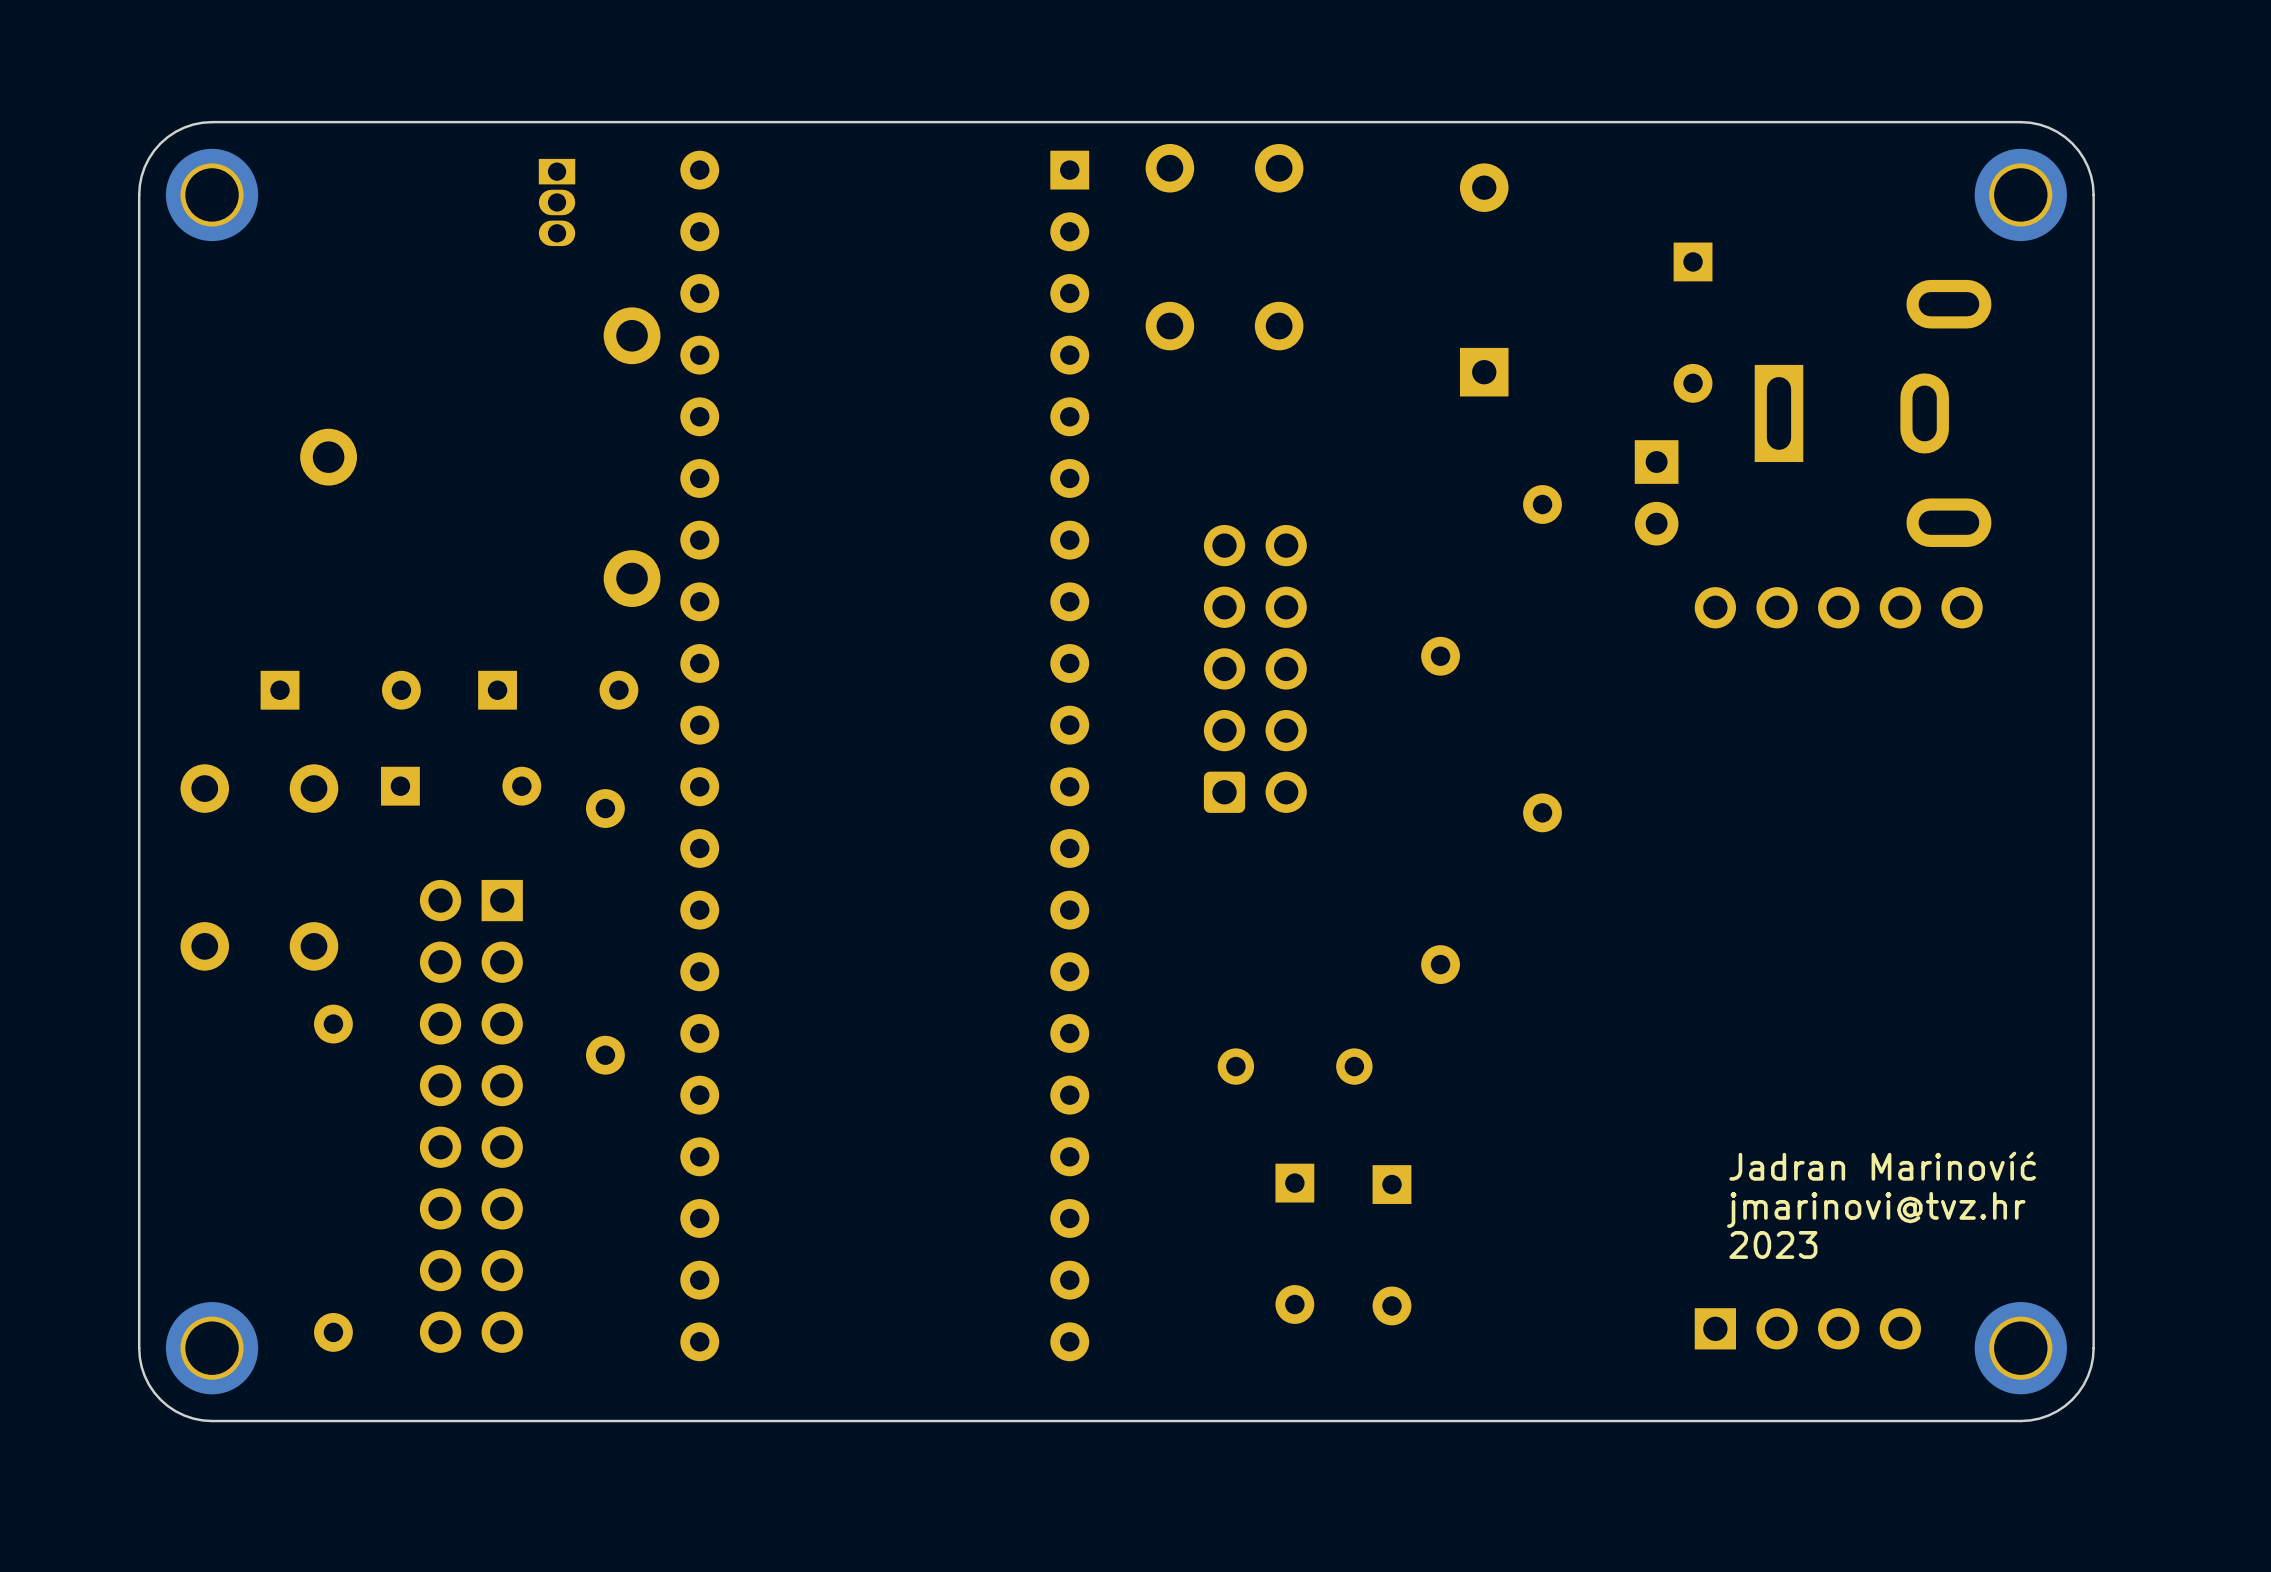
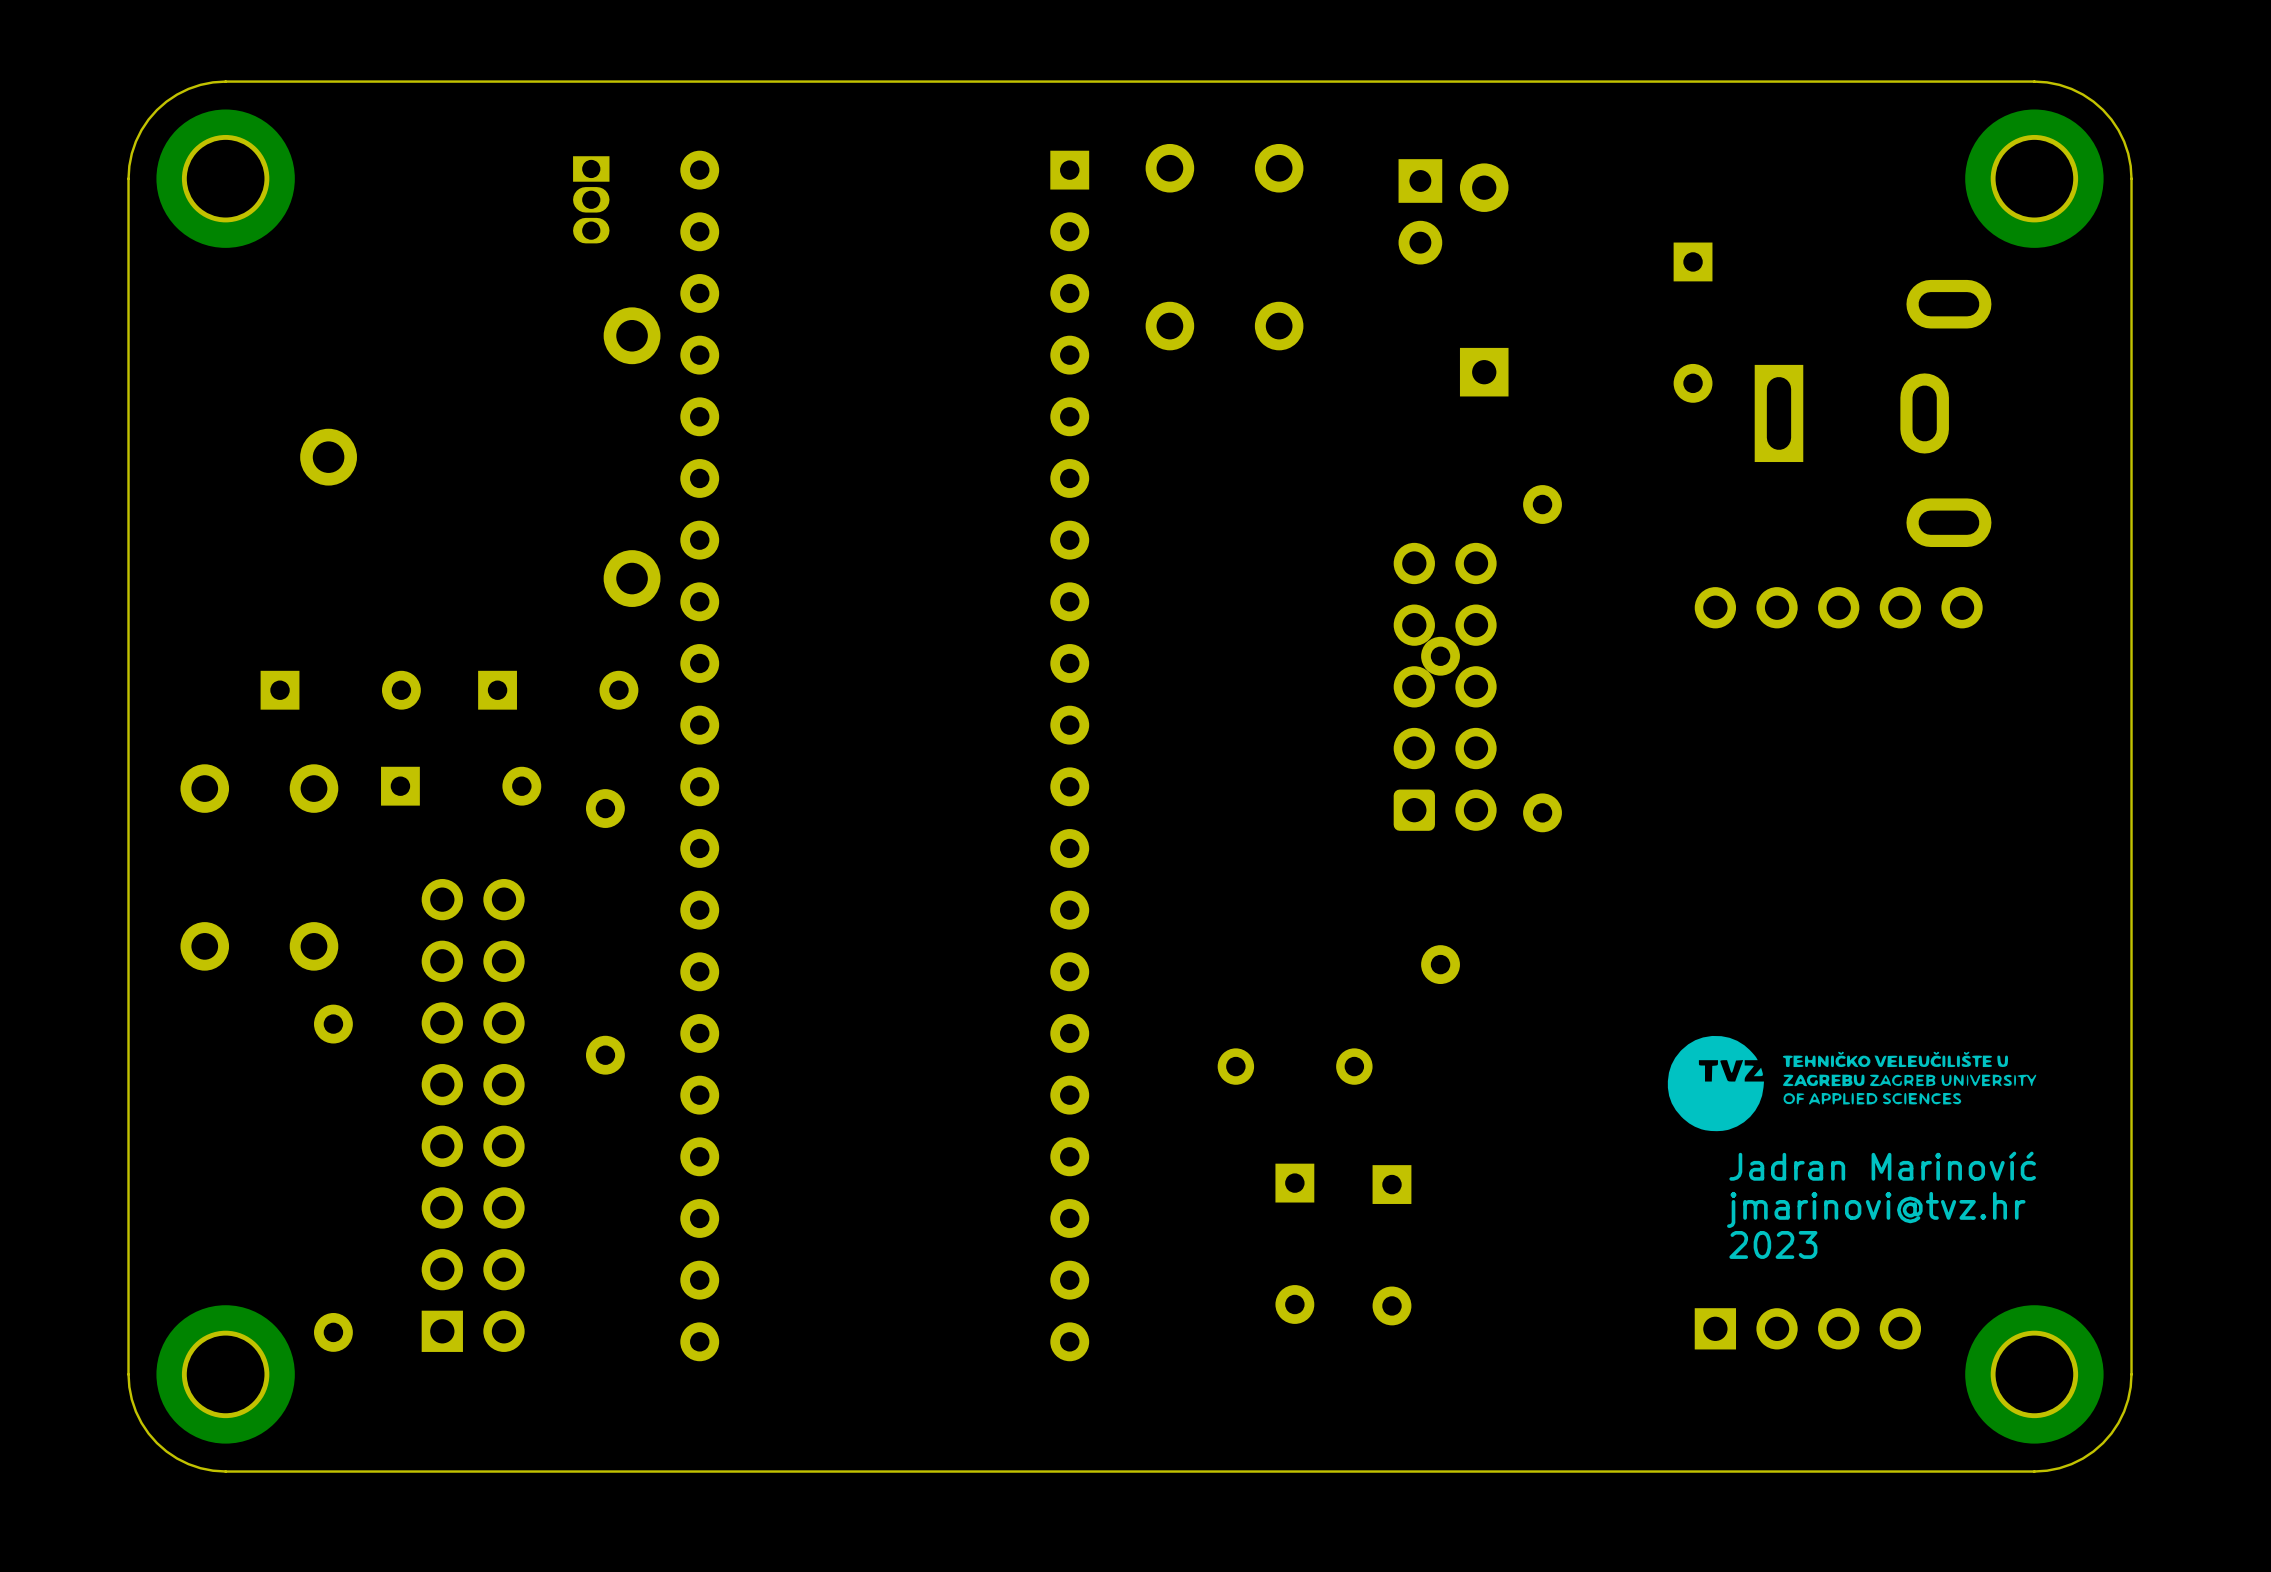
board edge: (2020, 122) (212, 122) (193, 124) (167, 137) (148, 158) (141, 176) (139, 194) (139, 1348) (141, 1367) (154, 1392) (167, 1405) (184, 1415) (212, 1421) (2020, 1421) (2039, 1418) (2065, 1405) (2083, 1384) (2091, 1367) (2093, 1348) (2093, 194) (2088, 167) (2072, 143) (2048, 127) (2020, 122) -> (2034, 81) (2047, 82) (2071, 88) (2093, 101) (2103, 110) (2111, 119) (2124, 141) (2128, 153) (2131, 178) (2131, 1374) (2130, 1387) (2124, 1411) (2111, 1433) (2093, 1451) (2071, 1464) (2047, 1470) (2034, 1471) (225, 1471) (200, 1468) (177, 1458) (166, 1451) (148, 1433) (135, 1411) (131, 1399) (128, 1374) (128, 178) (129, 166) (135, 141) (148, 119) (166, 101) (188, 88) (212, 82) (225, 81) (2034, 81)
part footprint: [165, 148, 259, 242] -> [156, 109, 295, 248]
part footprint: [1974, 148, 2067, 242] -> [1965, 109, 2104, 248]
part position: (557, 202) -> (591, 199)
part position: (1656, 492) -> (1420, 211)
part position: (1255, 668) -> (1445, 686)
drawing: none -> [1667, 1035, 2037, 1132]
part rotation: 0° (471, 1116) -> 180° (473, 1115)
part: (212, 1348) -> none
part: (2020, 1348) -> none
part: none -> (225, 1374)
part: none -> (2034, 1374)

